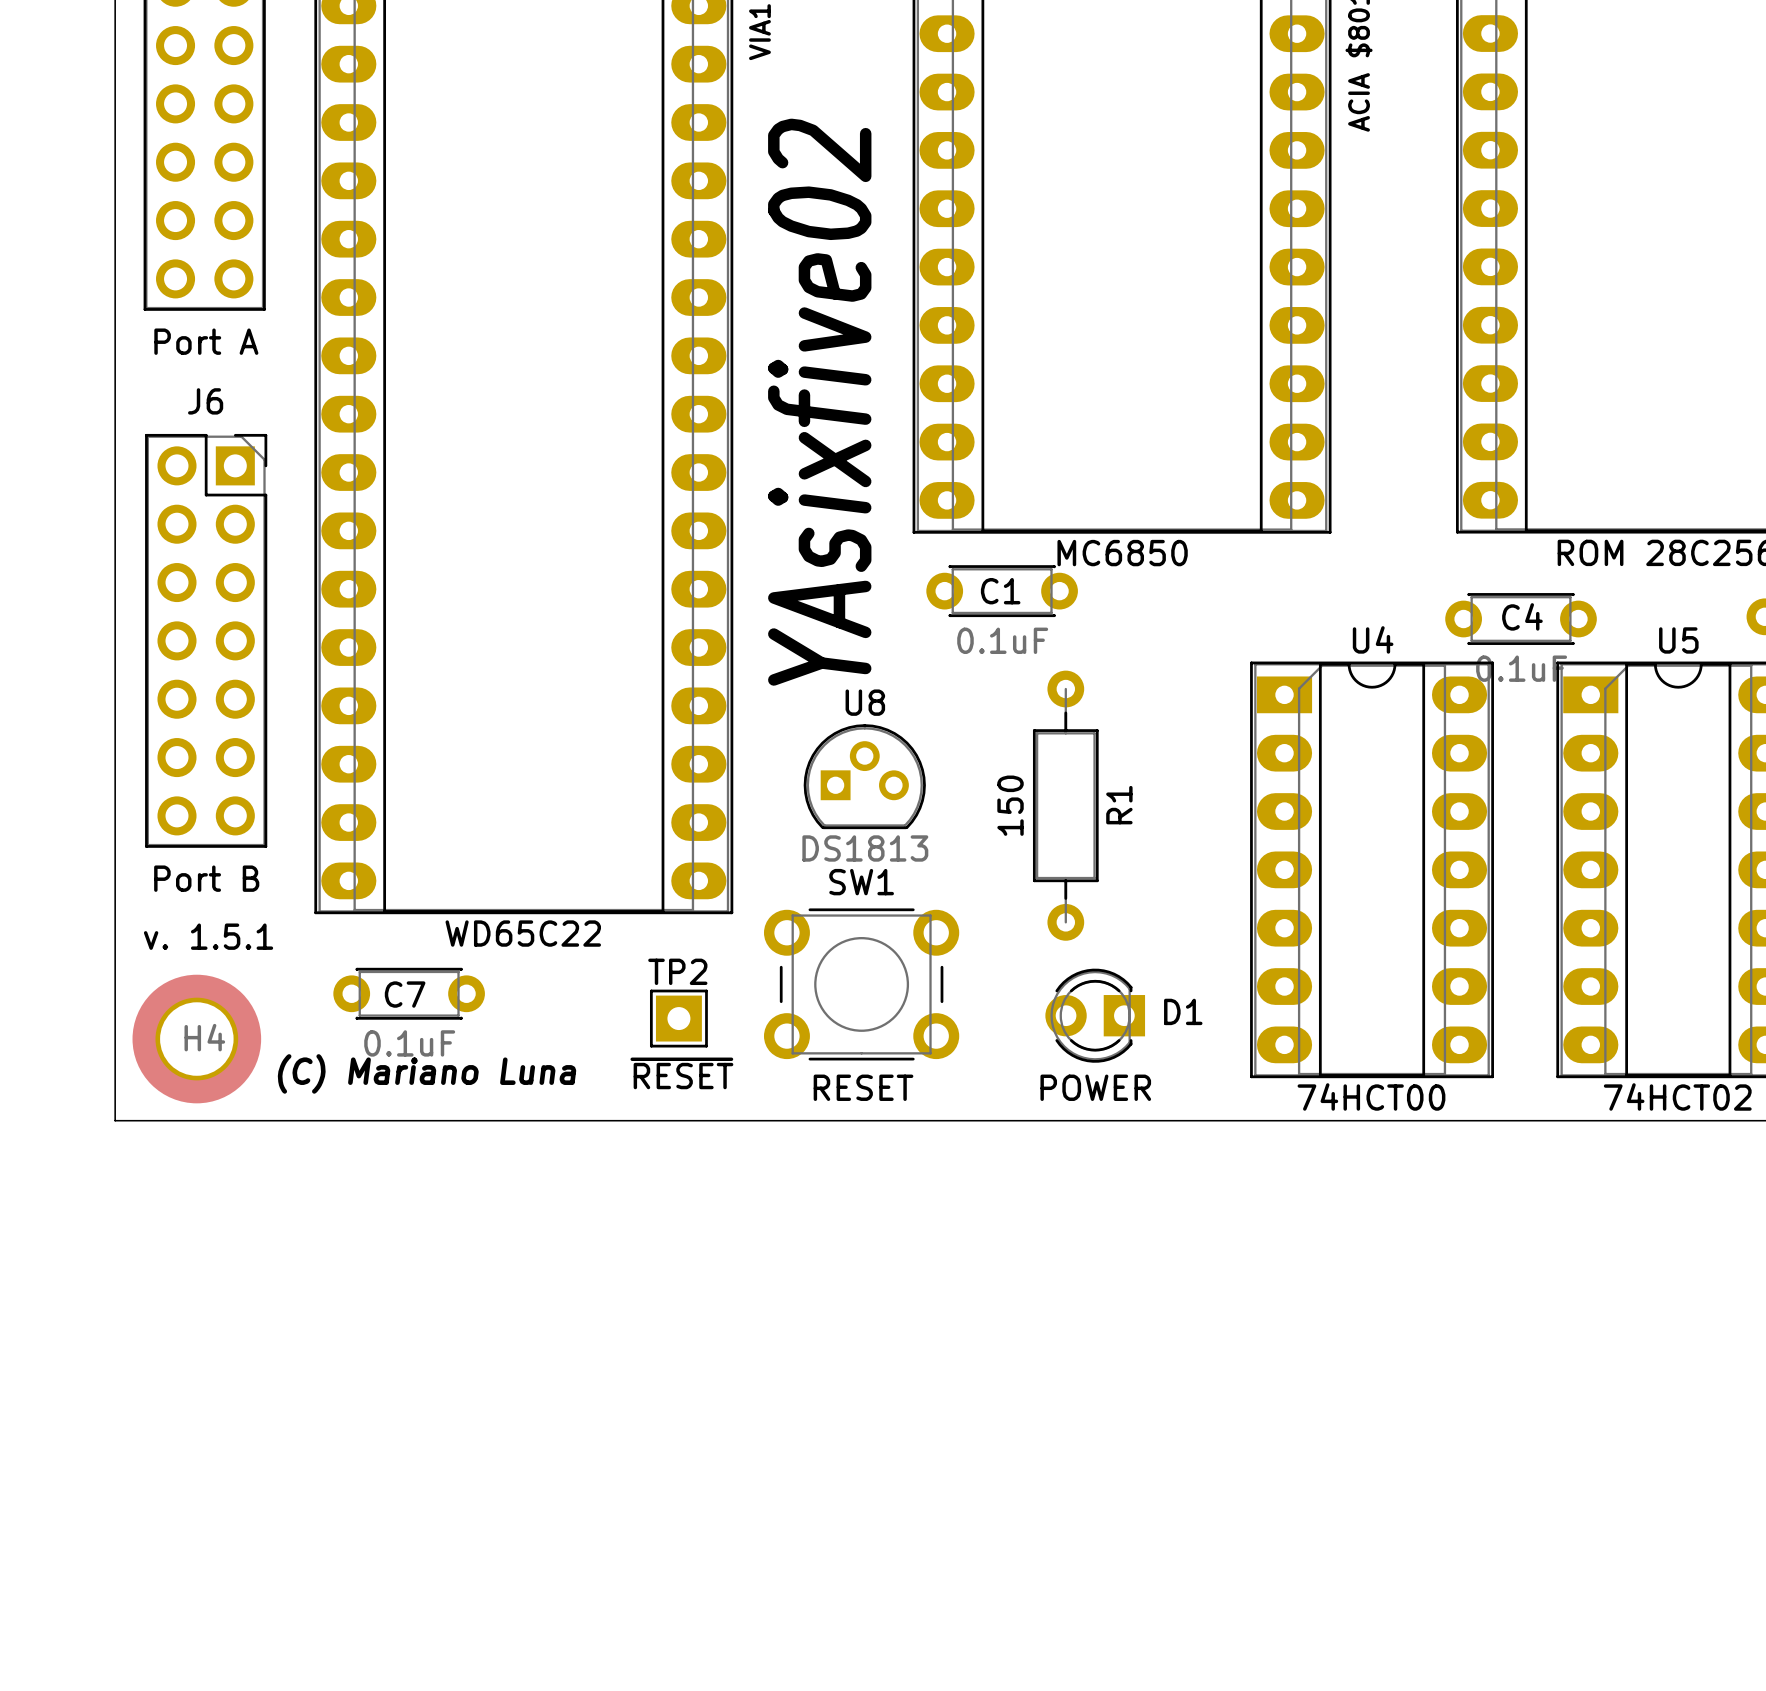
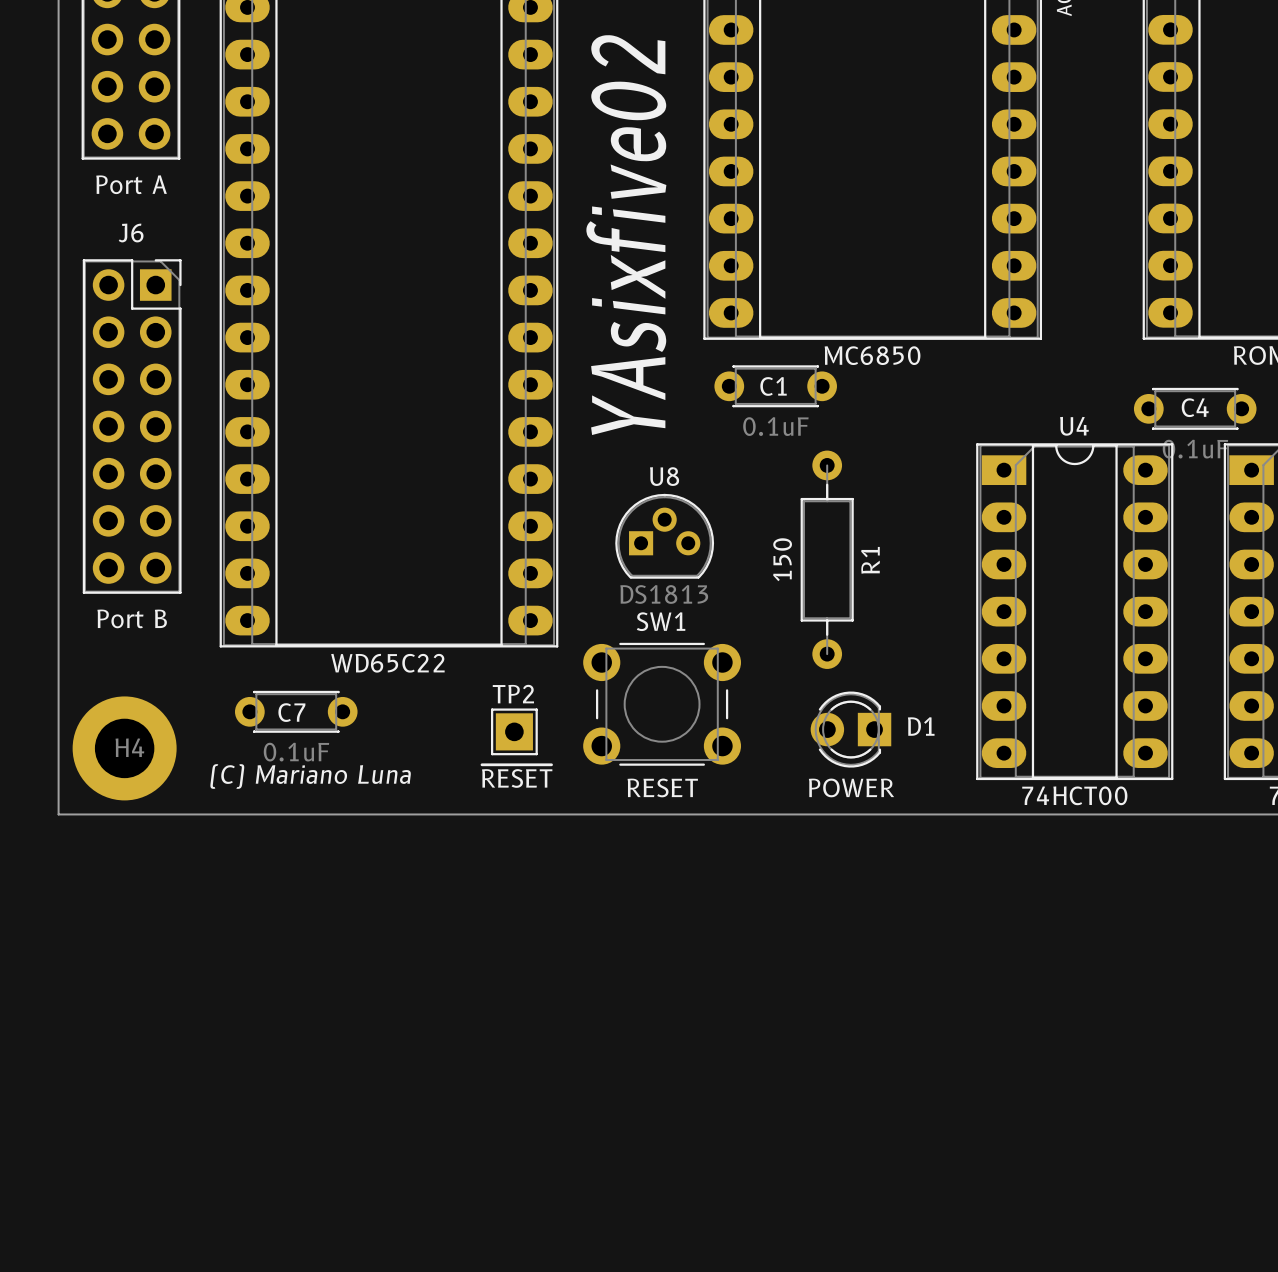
text: v. 1.5.1 (208, 936) -> none

